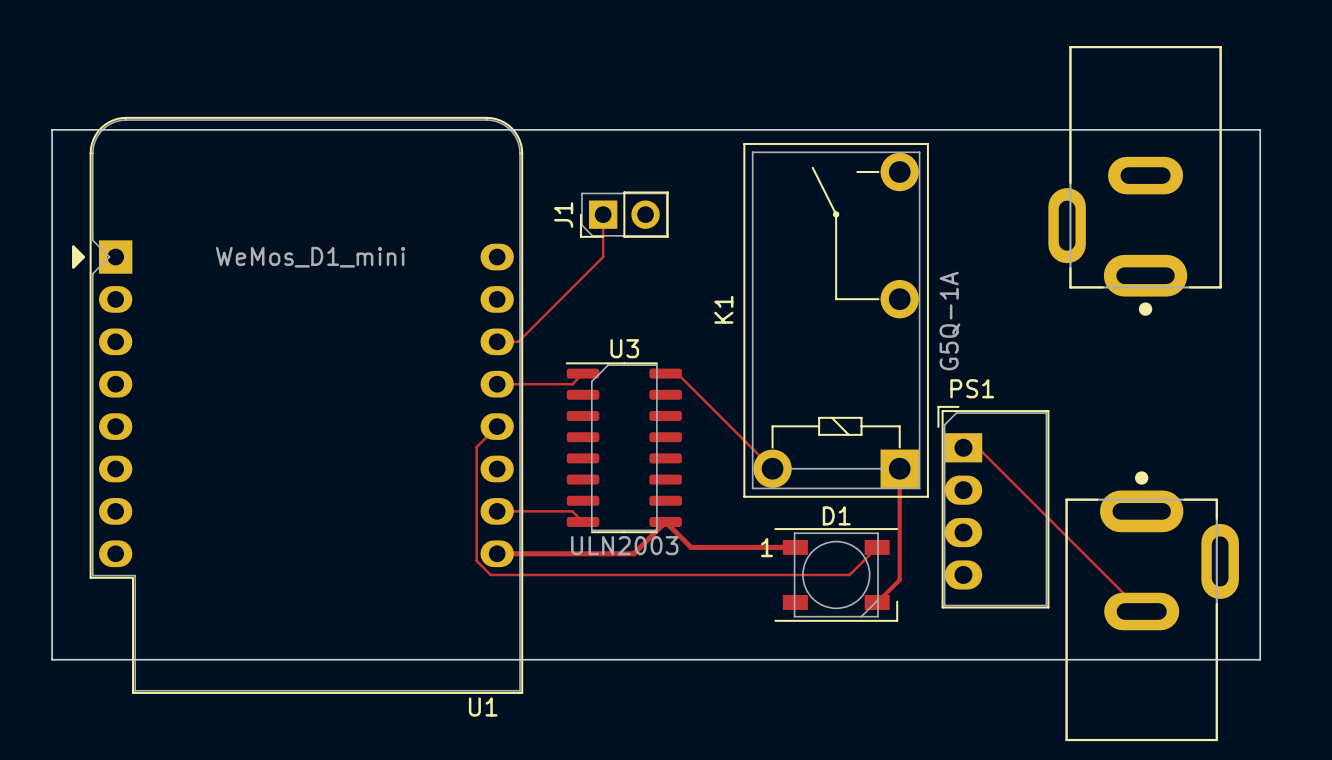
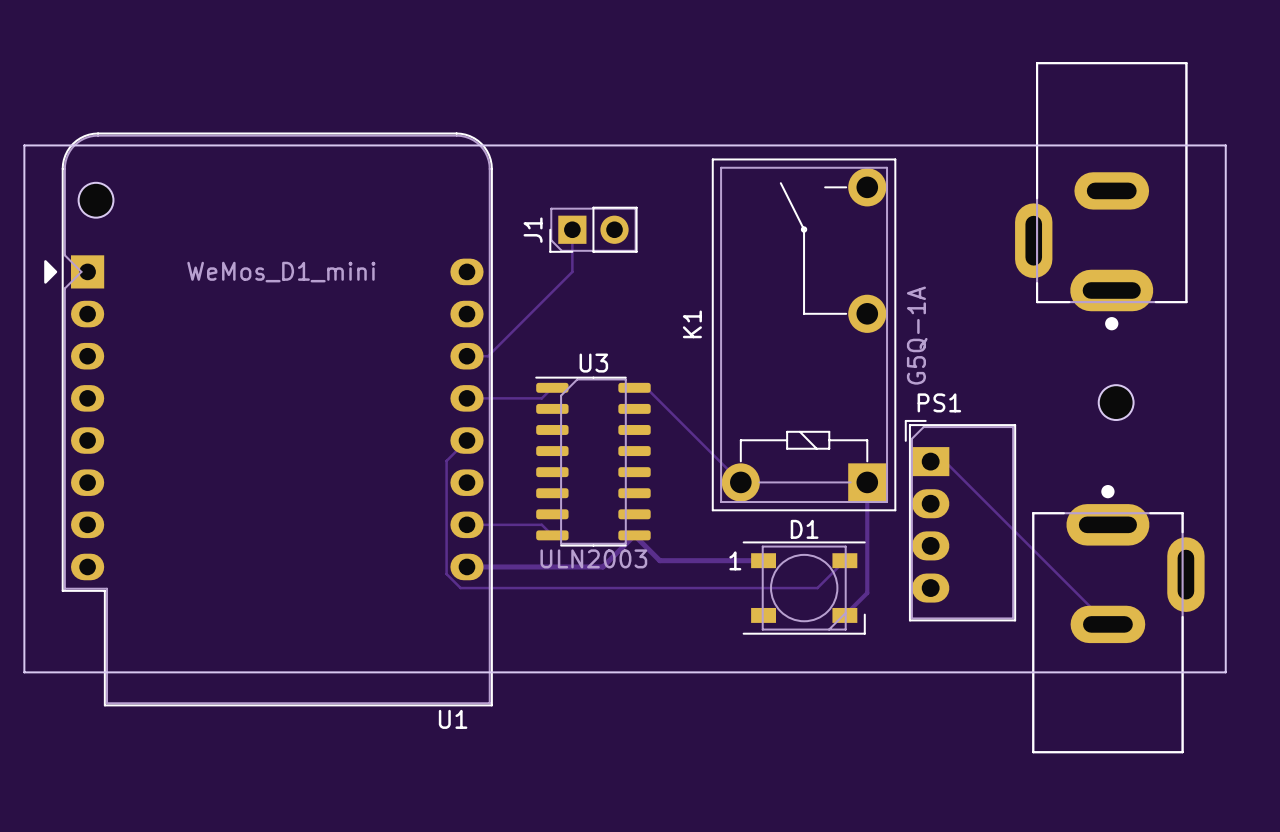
part: none -> (96, 200)
part: none -> (1116, 402)

